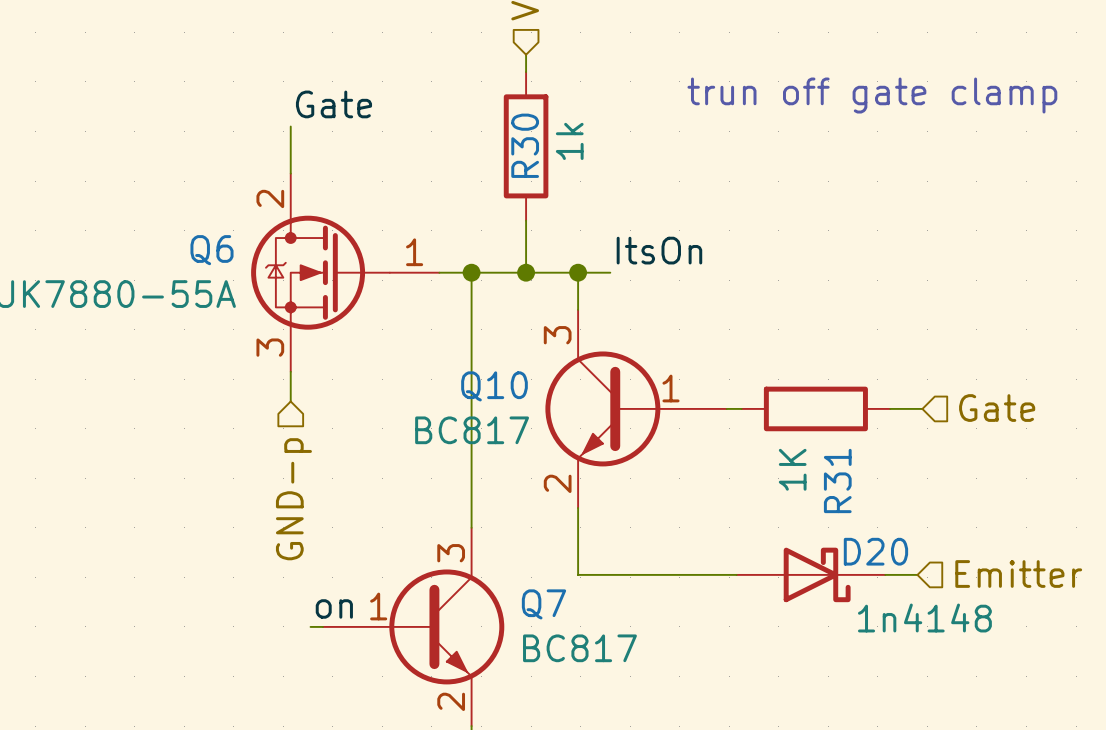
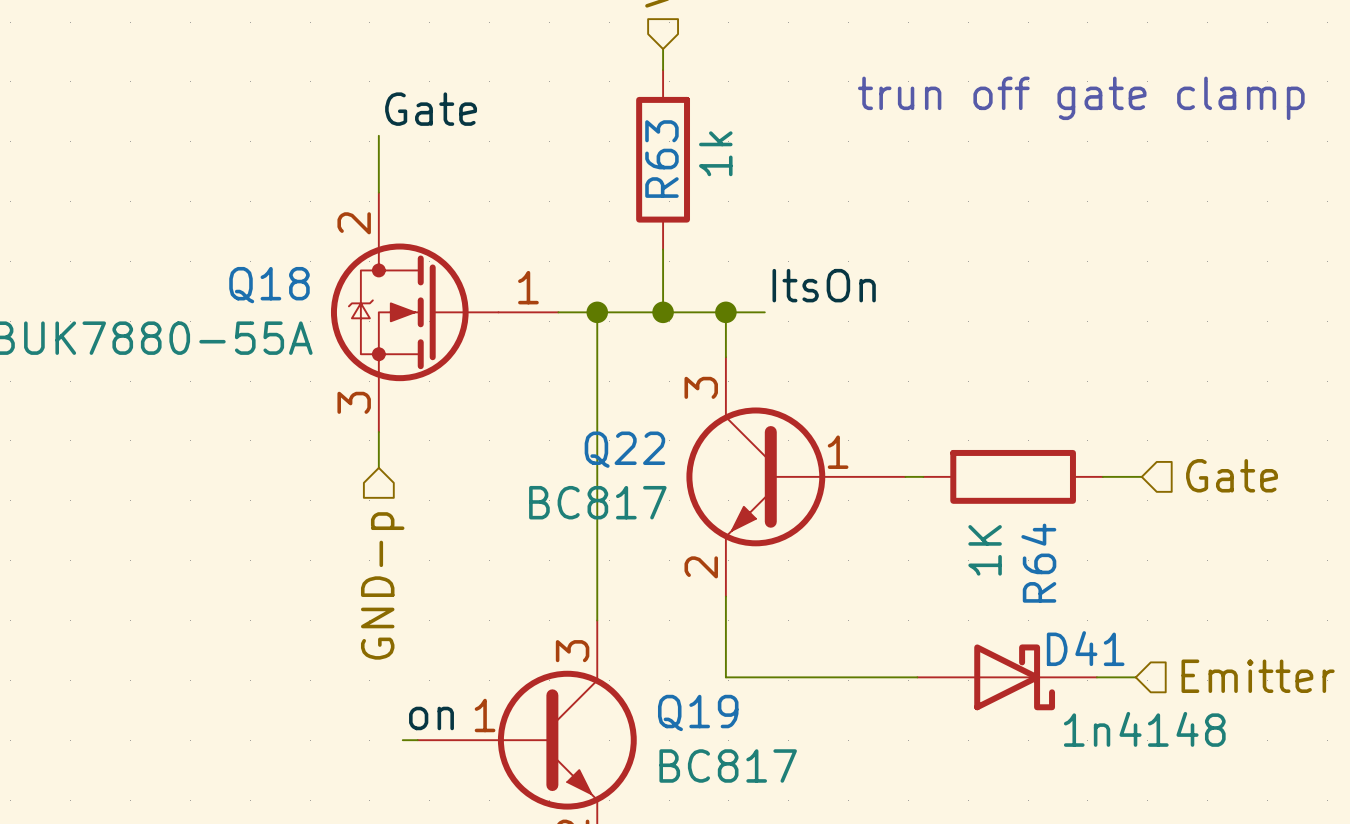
R30 name: R30 (525, 145) -> R63 (661, 159)
Q6 name: Q6 (211, 250) -> Q18 (269, 285)
Q10 name: Q10 (494, 386) -> Q22 (624, 449)
R31 name: R31 (837, 480) -> R64 (1038, 563)
D20 name: D20 (875, 551) -> D41 (1085, 648)
Q7 name: Q7 (543, 604) -> Q19 (698, 712)

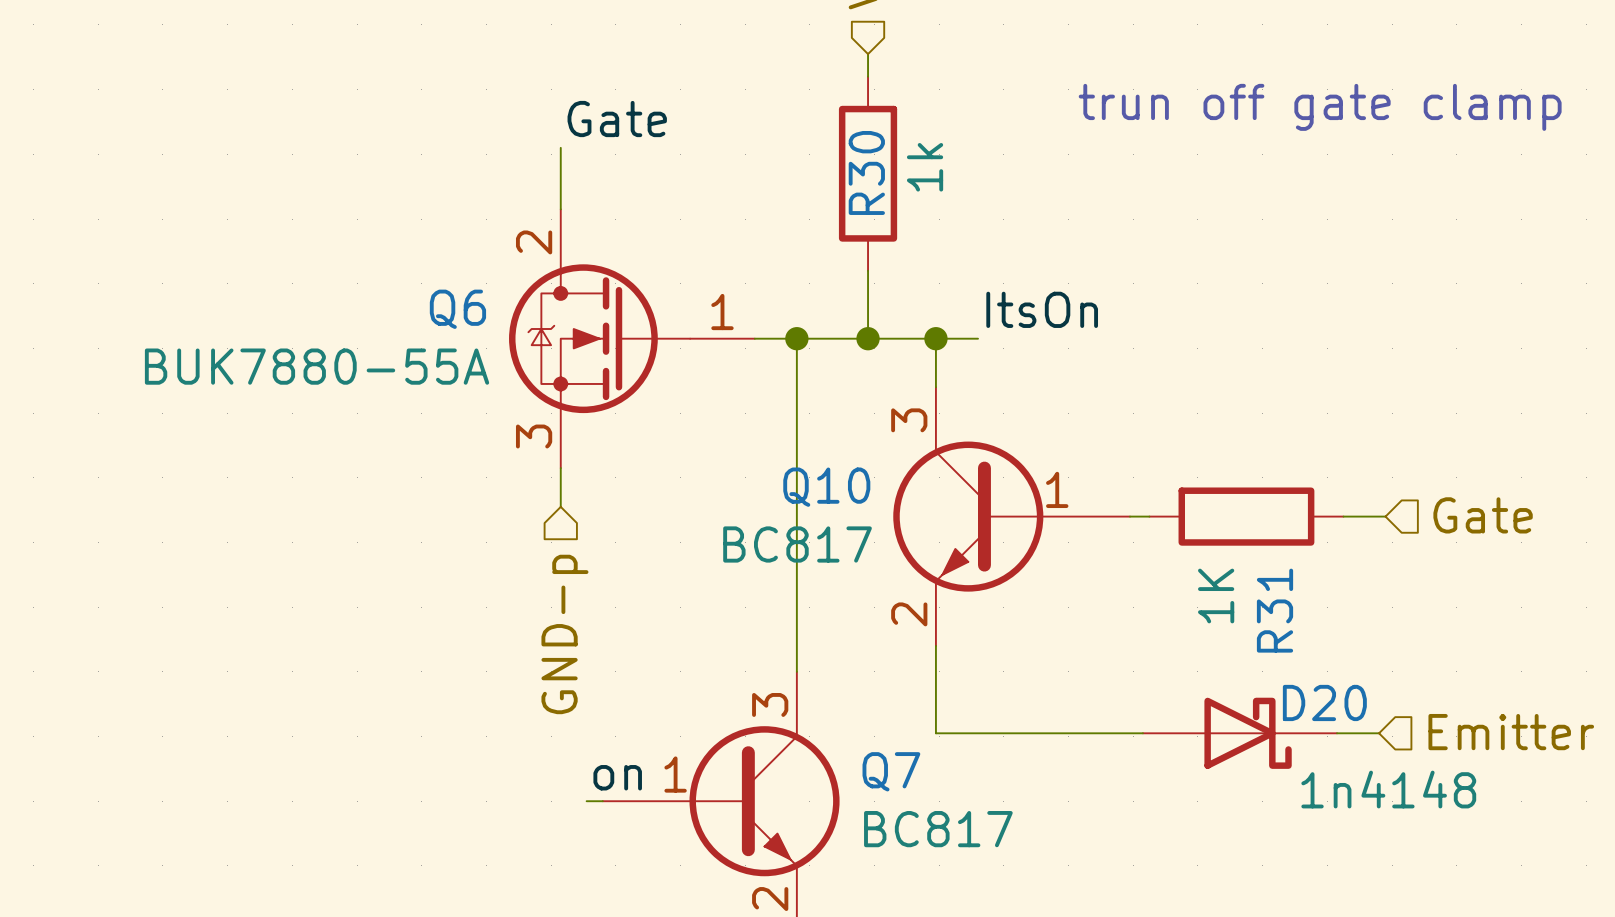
R63 name: R63 (661, 159) -> R30 (866, 172)
Q18 name: Q18 (269, 285) -> Q6 (457, 309)
Q22 name: Q22 (624, 449) -> Q10 (826, 487)
R64 name: R64 (1038, 563) -> R31 (1275, 610)
D41 name: D41 (1085, 648) -> D20 (1324, 702)
Q19 name: Q19 (698, 712) -> Q7 (891, 771)

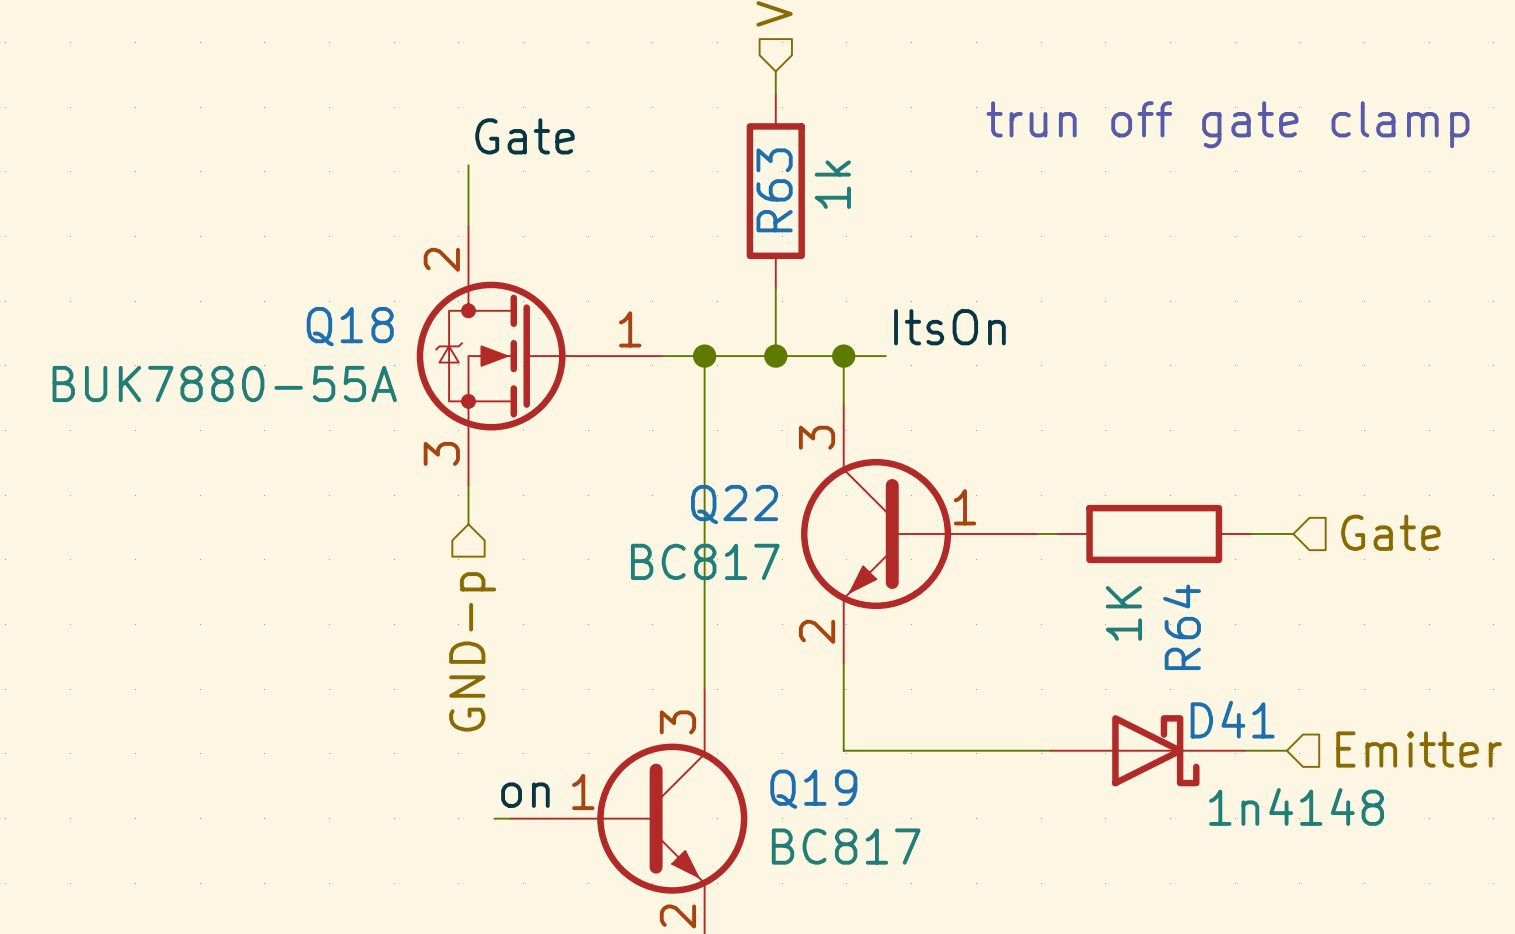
R30 name: R30 (866, 172) -> R63 (774, 190)
Q6 name: Q6 (457, 309) -> Q18 (350, 326)
Q10 name: Q10 (826, 487) -> Q22 (734, 504)
R31 name: R31 (1275, 610) -> R64 (1182, 627)
D20 name: D20 (1324, 702) -> D41 (1232, 719)
Q7 name: Q7 (891, 771) -> Q19 (813, 789)

